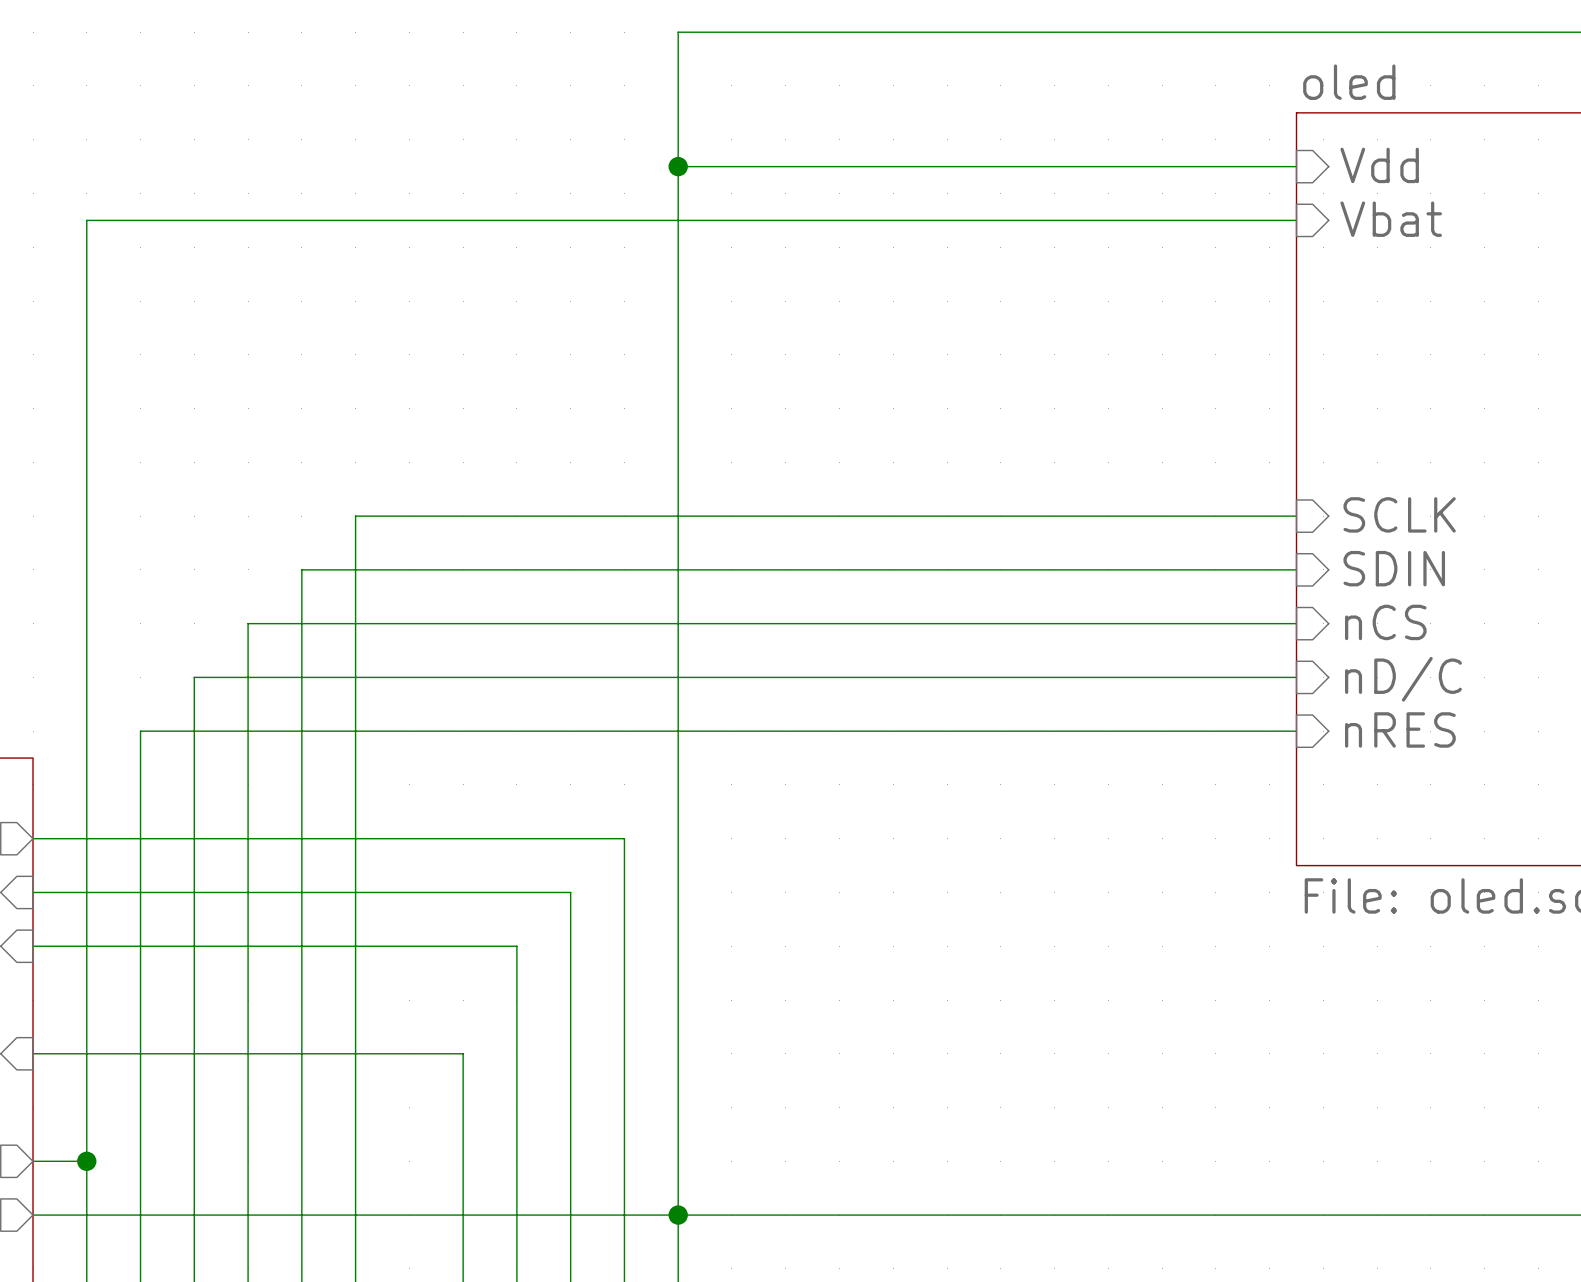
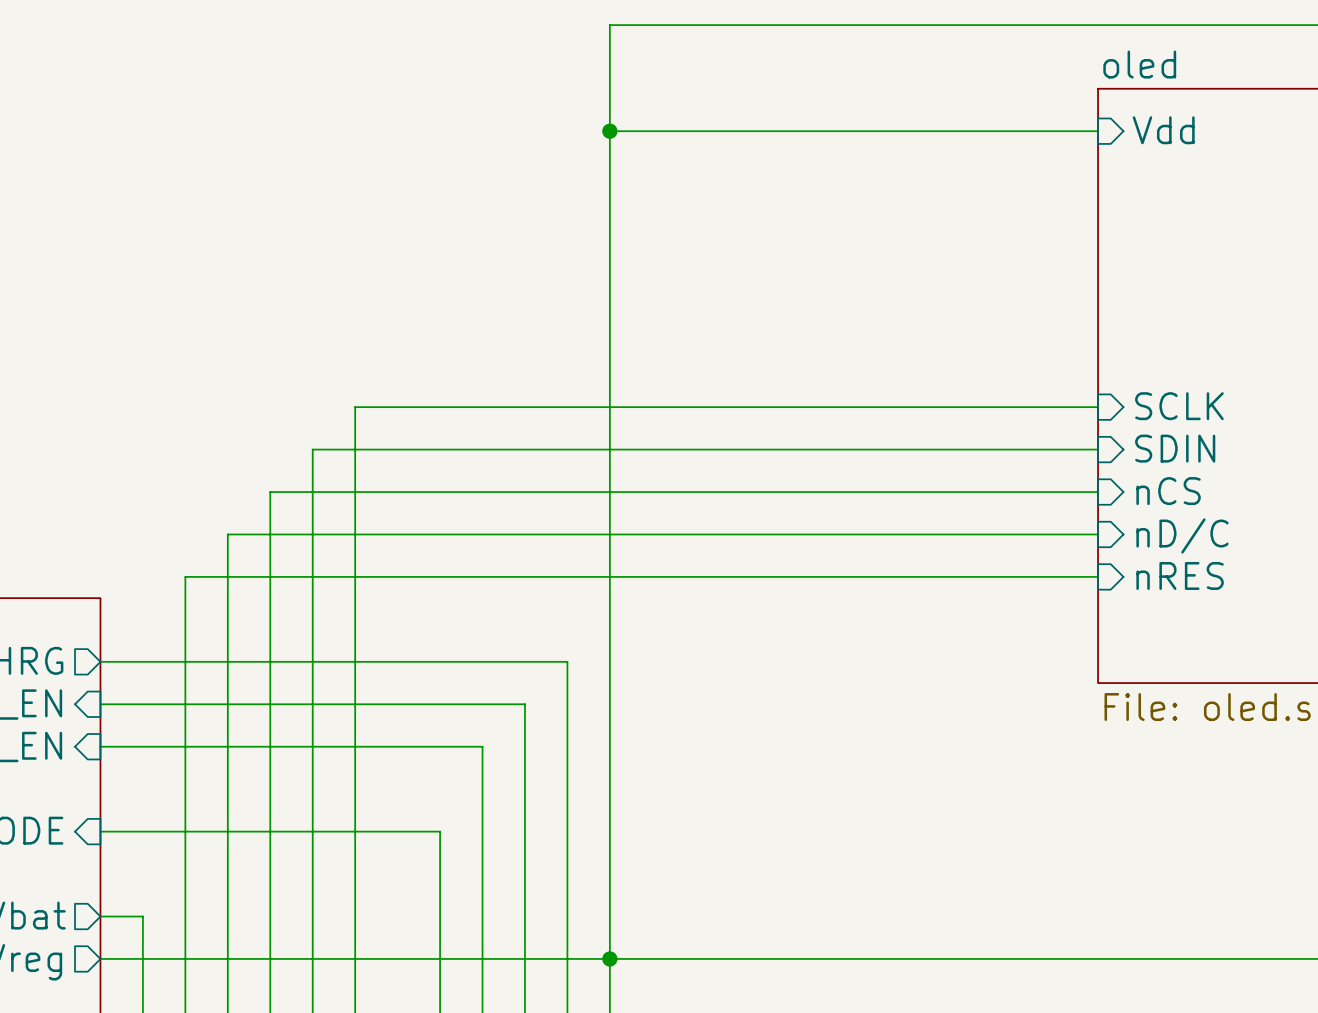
sheet pin: Vbat (1391, 219) -> none
wire: (1296, 220) (86, 220) (86, 1161) -> none
junction: (86, 1161) -> none

